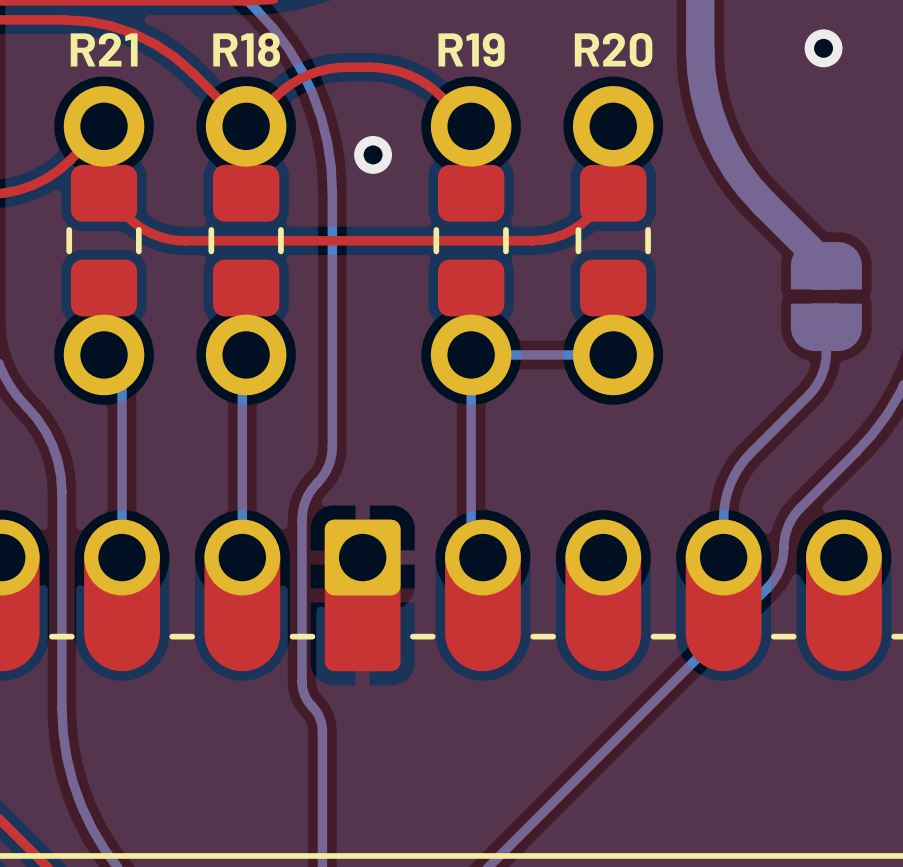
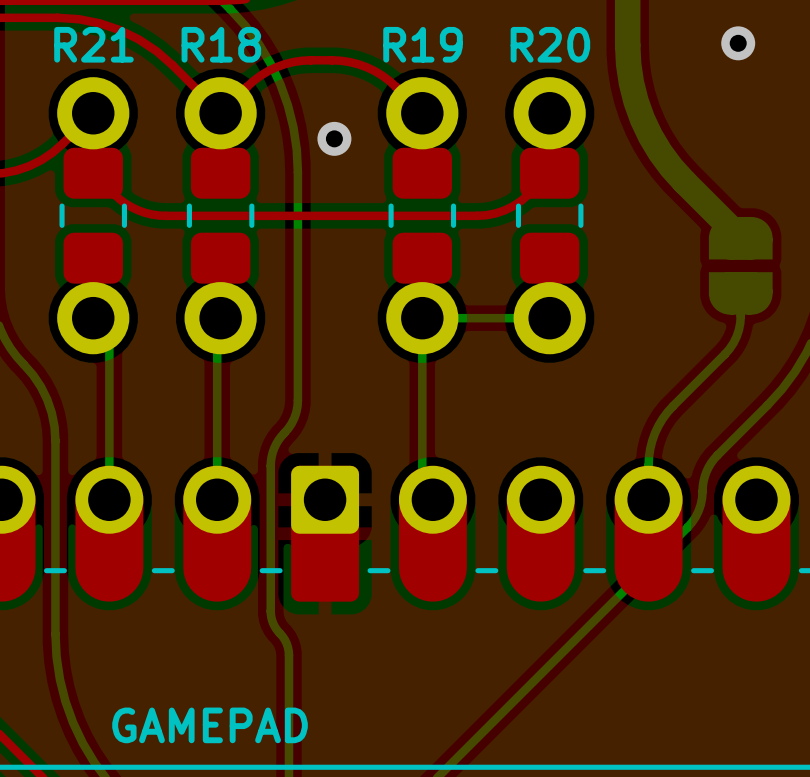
text: none -> GAMEPAD (210, 725)

